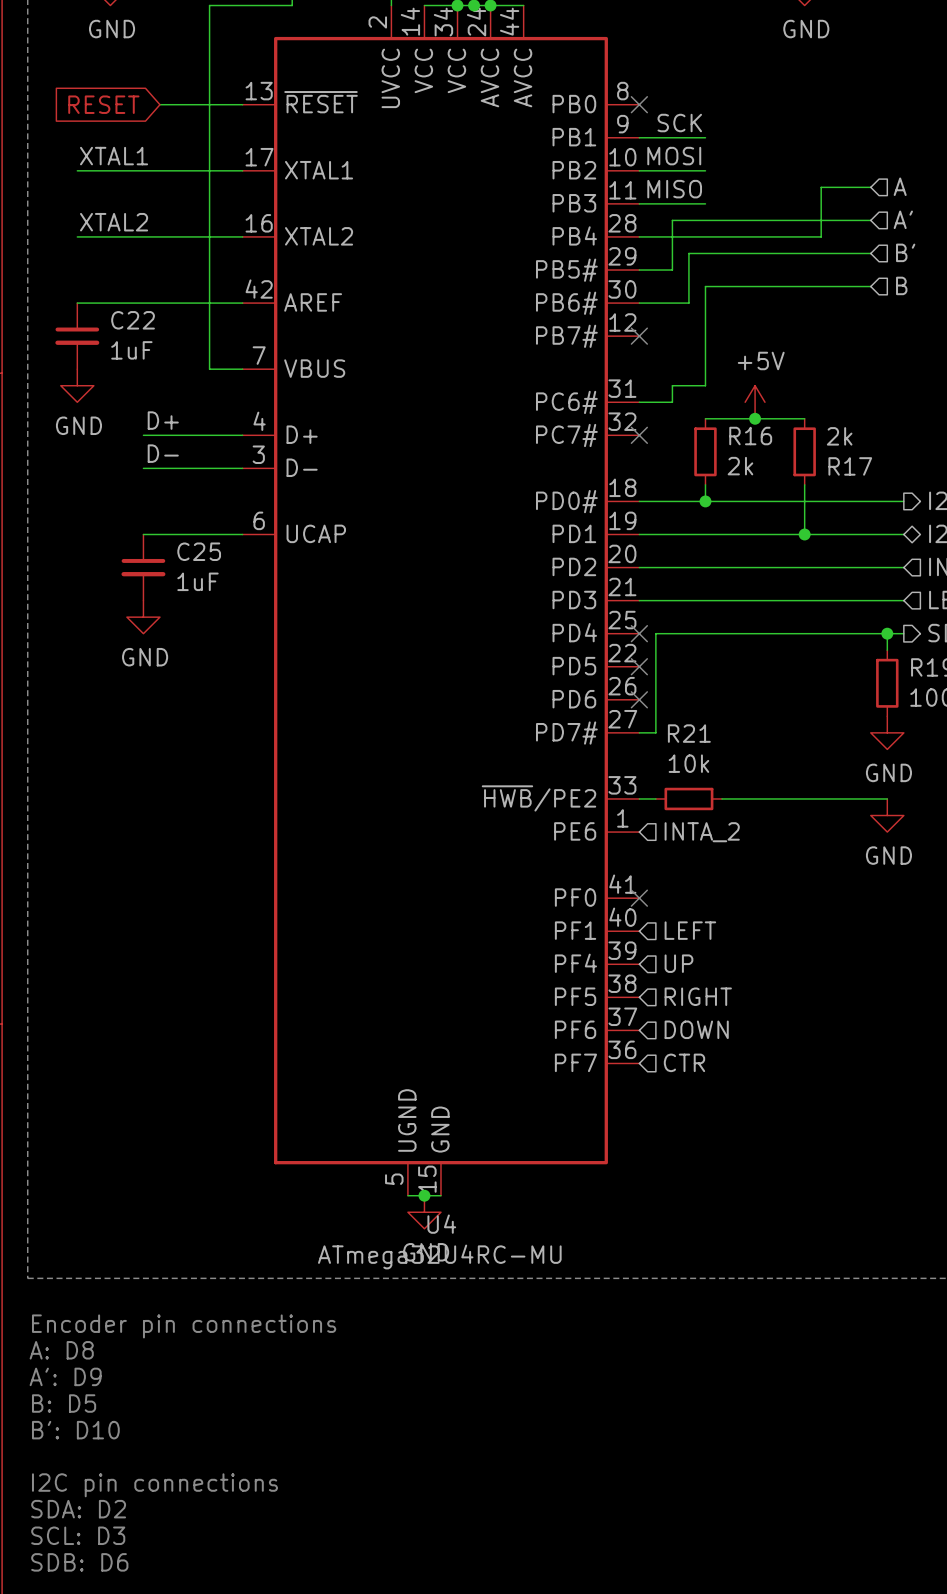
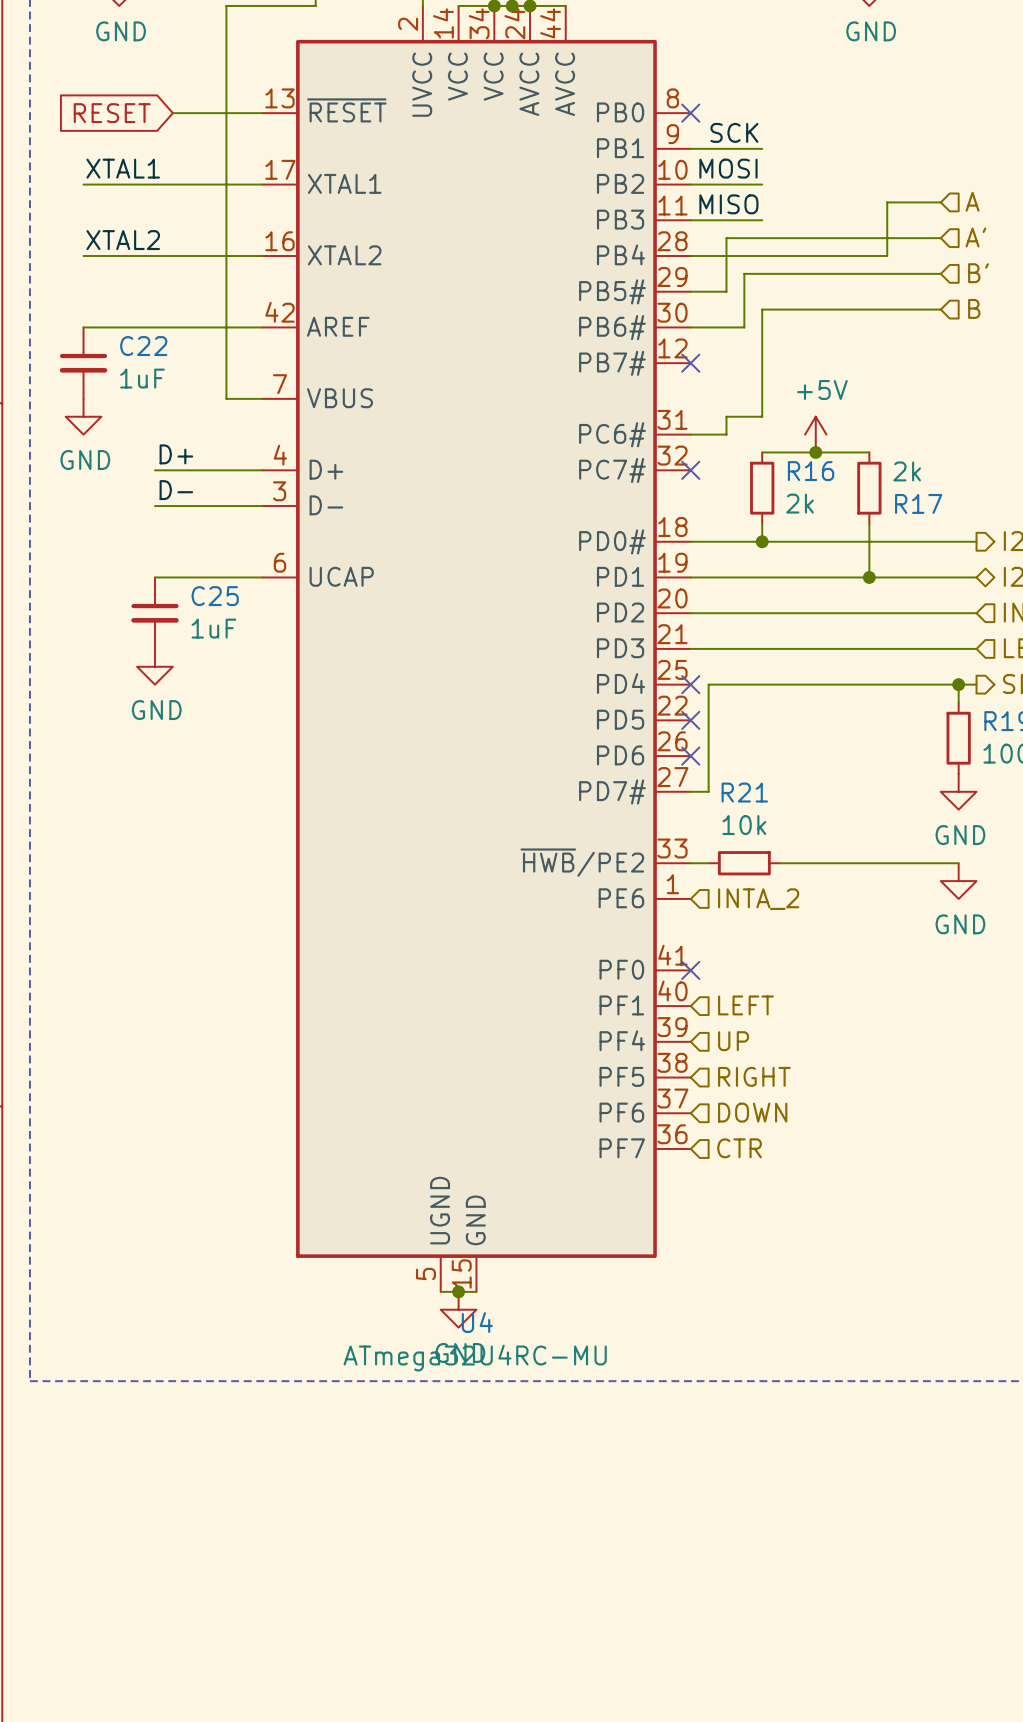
text: Encoder pin connections (184, 1326) -> none
text: A: D8 (61, 1350) -> none
text: A': D9 (65, 1376) -> none
text: B: D5 (64, 1403) -> none
text: B': D10 (75, 1430) -> none
text: I2C pin connections (154, 1485) -> none
text: SDA: D2 (78, 1509) -> none
text: SCL: D3 (78, 1535) -> none
text: SDB: D6 (79, 1562) -> none

